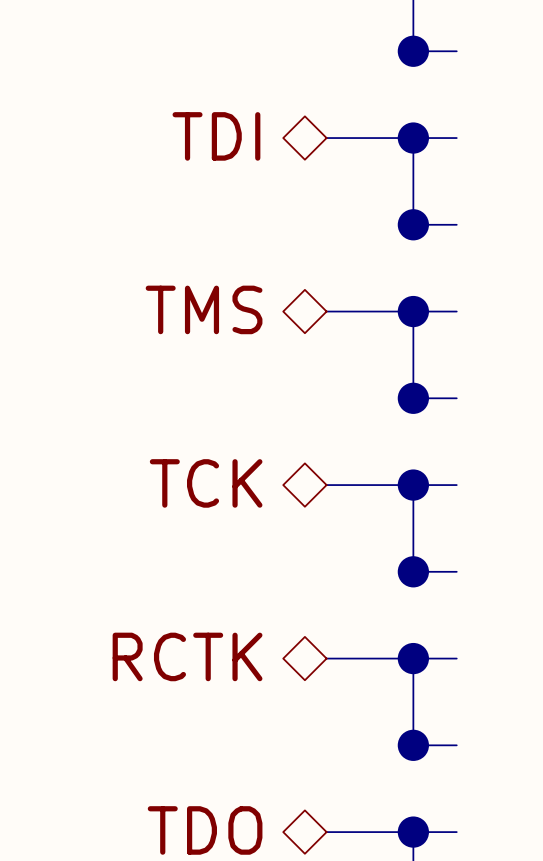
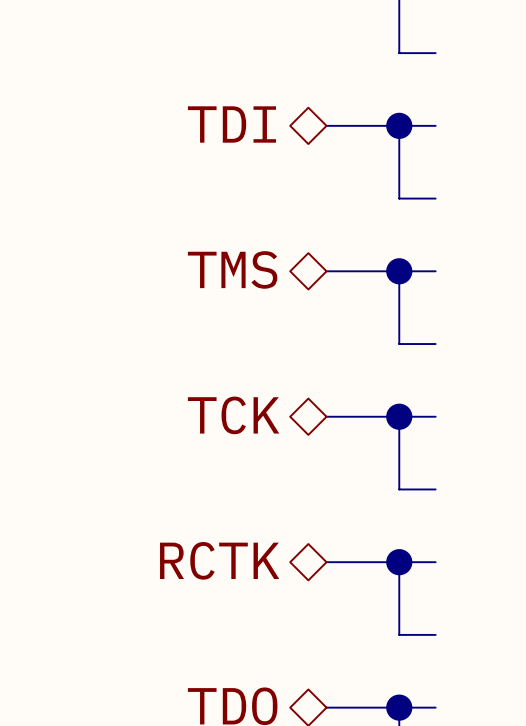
junction: (413, 51) -> none
junction: (413, 224) -> none
junction: (413, 398) -> none
junction: (413, 571) -> none
junction: (413, 745) -> none

